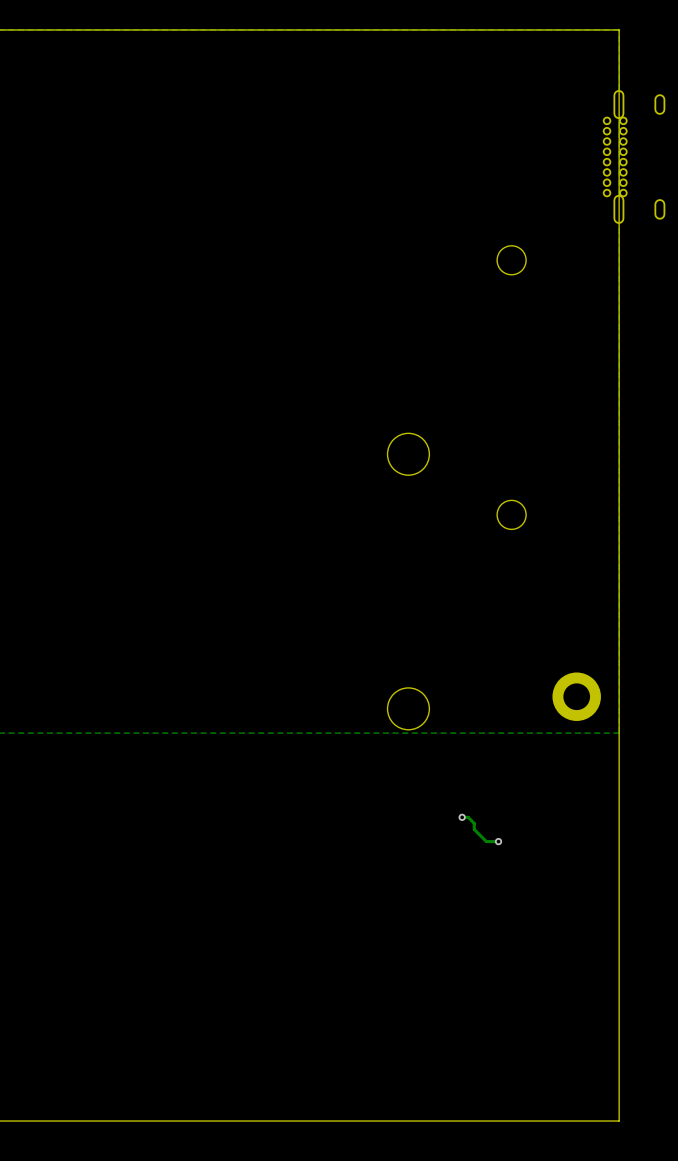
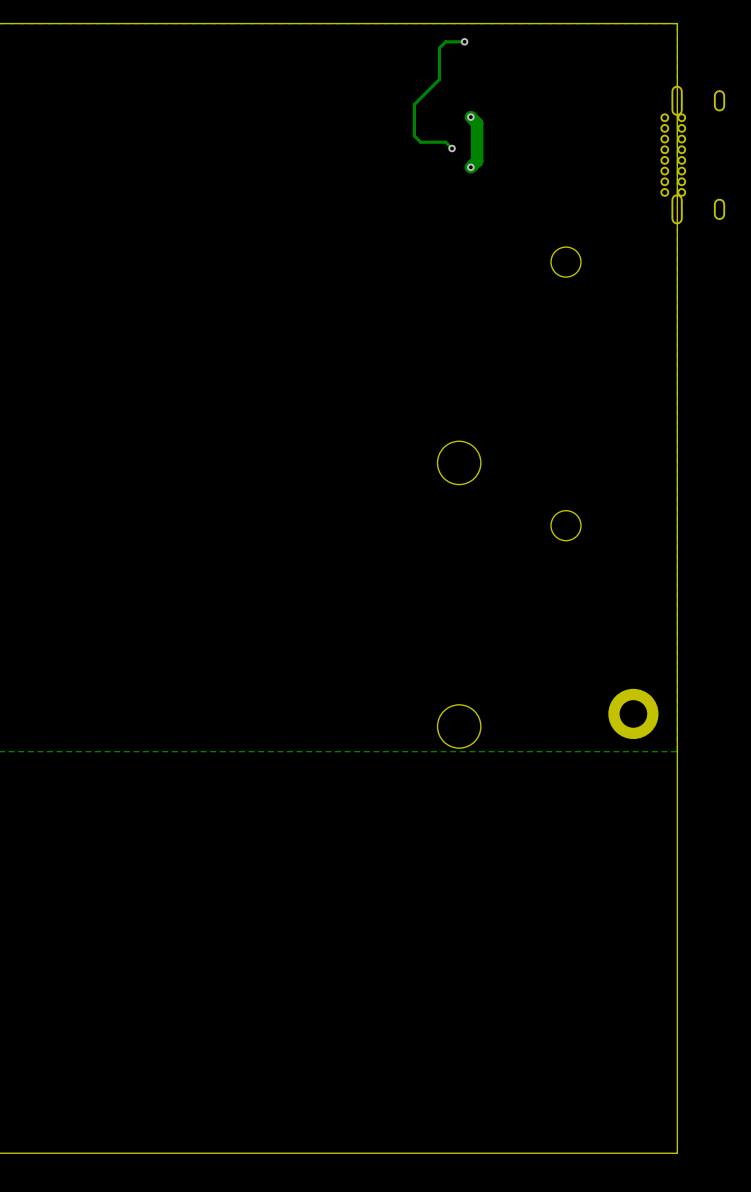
track: none -> (464, 41) (445, 41) (439, 48) (439, 79) (414, 104) (414, 135) (420, 142) (445, 142) (452, 148)
via: none -> (464, 41)
track: none -> (470, 117) (477, 123) (477, 161) (470, 167)
via: none -> (470, 117)
via: none -> (452, 148)
via: none -> (470, 167)
track: (462, 817) (468, 817) (474, 823) (474, 829) (486, 841) (498, 841) -> none
via: (462, 817) -> none
via: (498, 841) -> none

